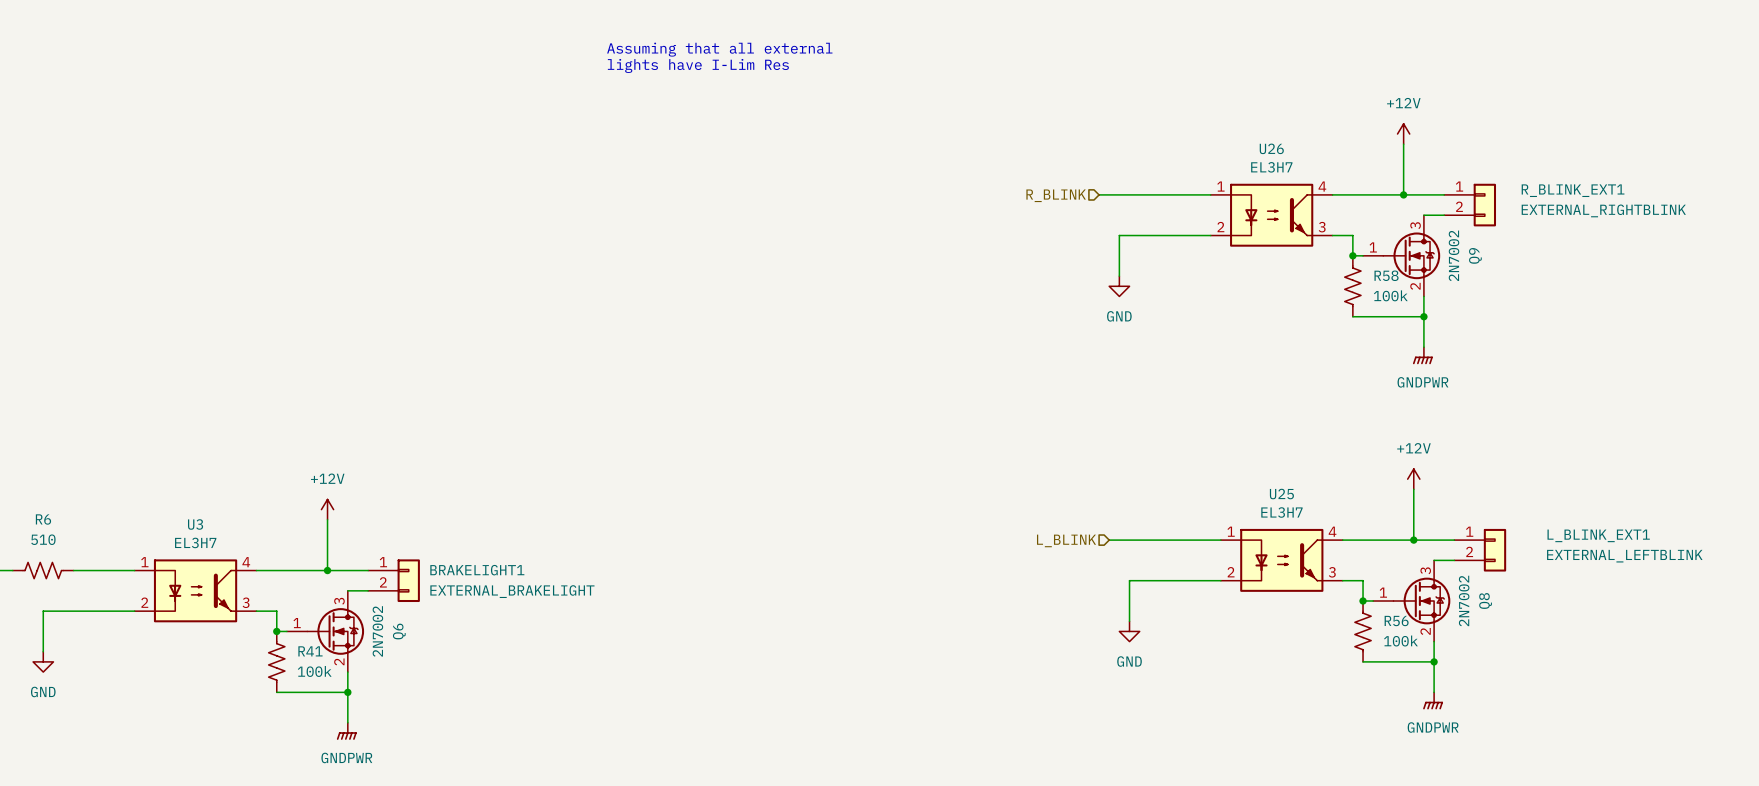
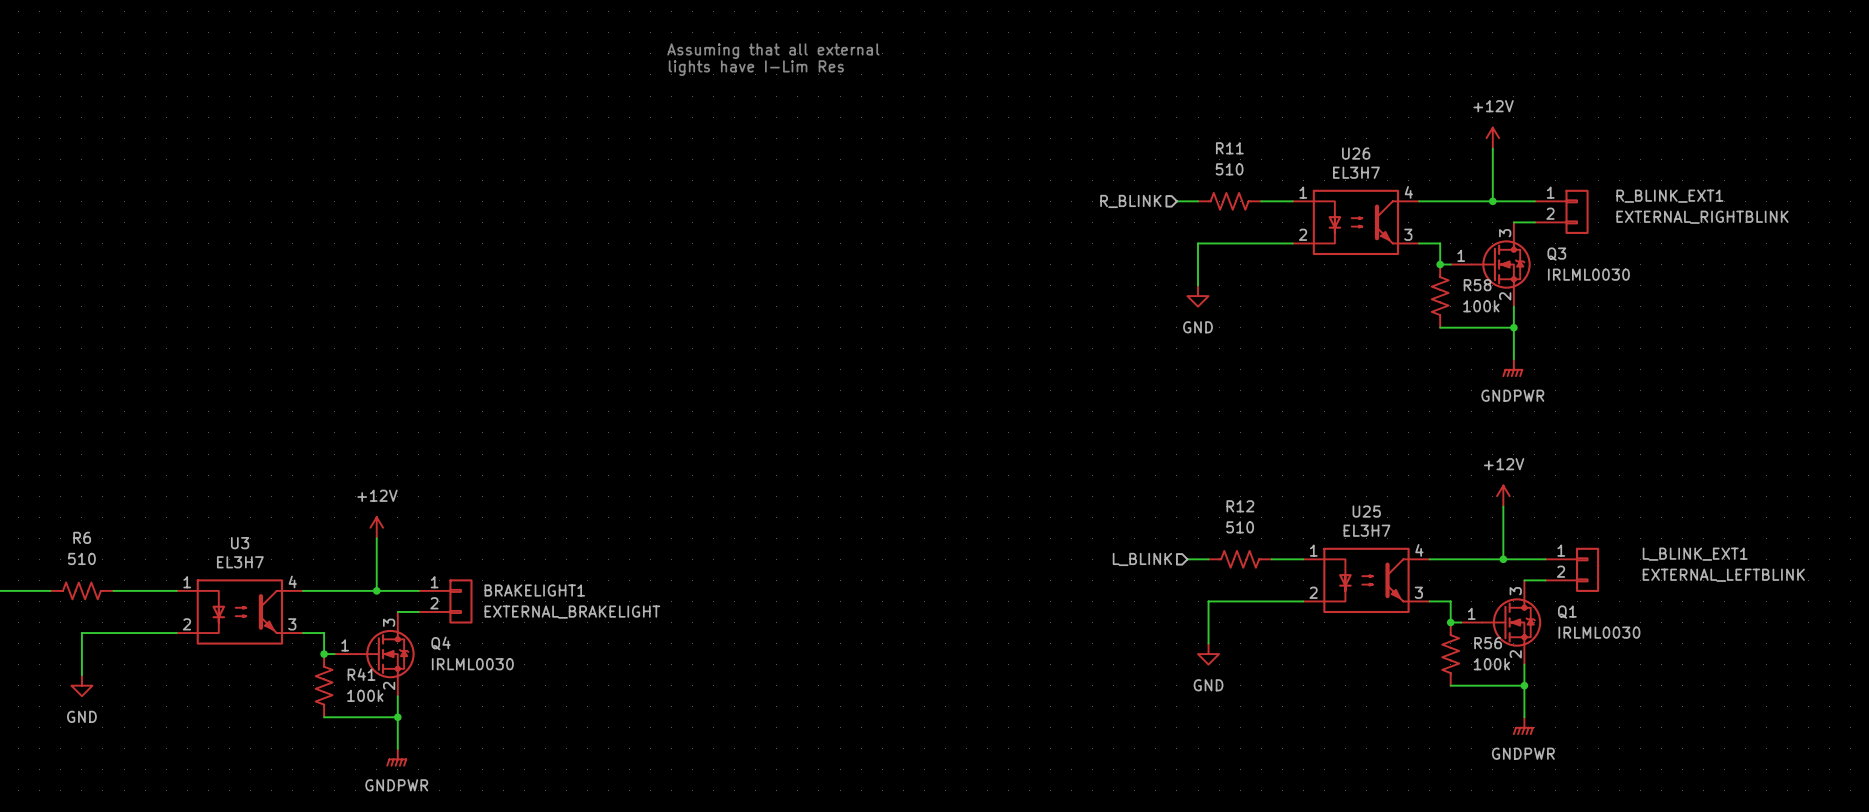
R11: none -> 510 (1229, 201)
Q9 value: 2N7002 (1454, 255) -> IRLML0030 (1588, 274)
Q9 name: Q9 (1475, 255) -> Q3 (1556, 254)
R12: none -> 510 (1240, 559)
Q8 value: 2N7002 (1464, 600) -> IRLML0030 (1599, 632)
Q8 name: Q8 (1485, 600) -> Q1 (1567, 612)
Q6 value: 2N7002 (377, 631) -> IRLML0030 (472, 664)
Q6 name: Q6 (399, 631) -> Q4 (440, 643)

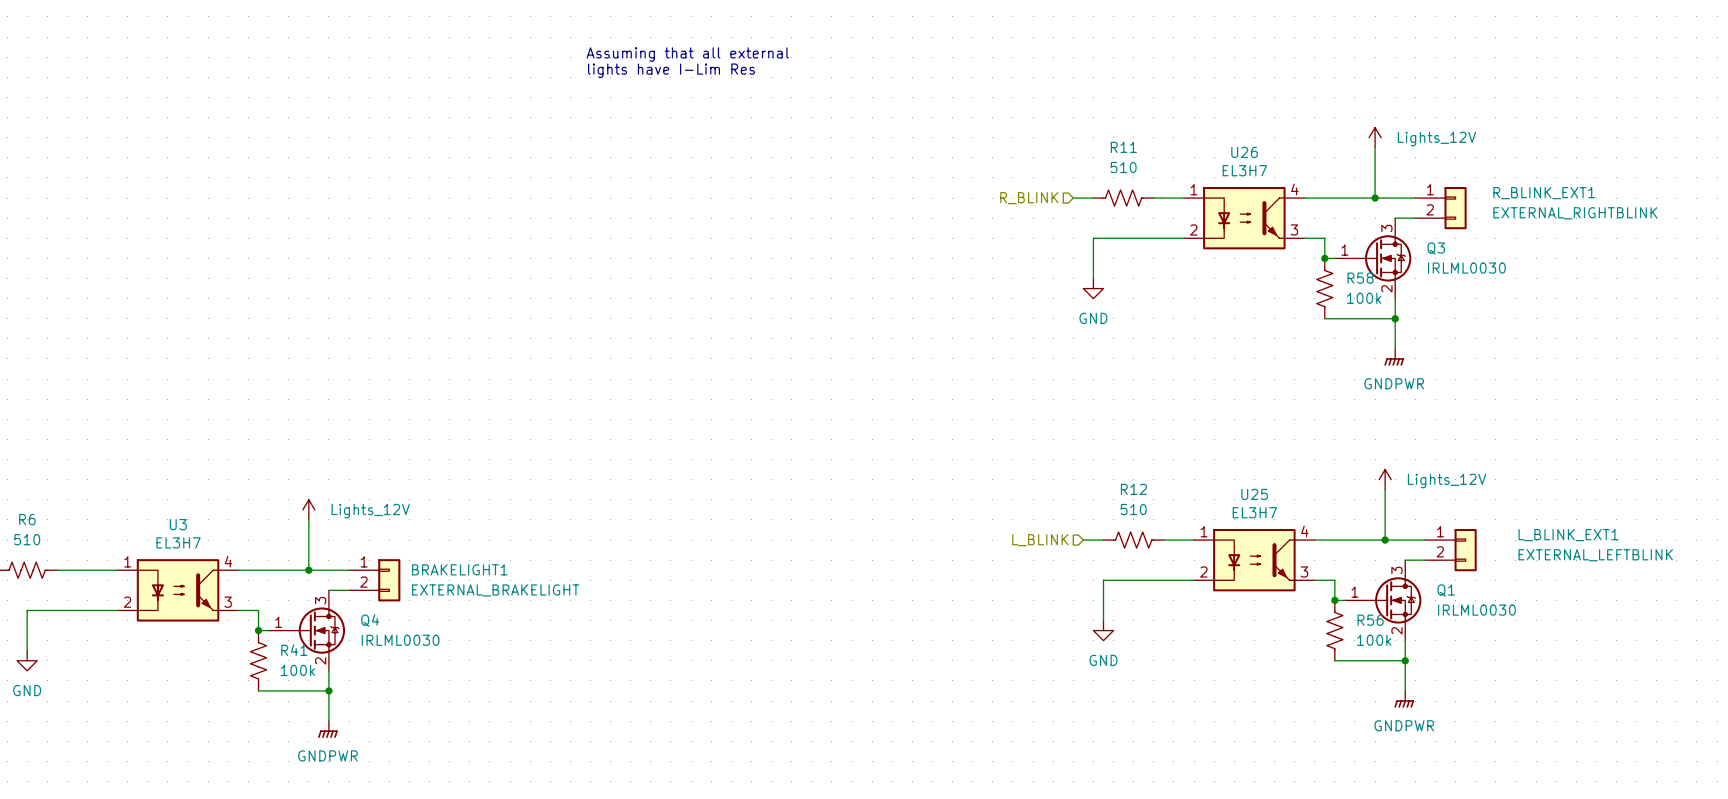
power symbol: +12V (1492, 138) -> Lights_12V (1375, 137)
power symbol: +12V (1503, 496) -> Lights_12V (1385, 479)
power symbol: +12V (376, 527) -> Lights_12V (308, 509)

